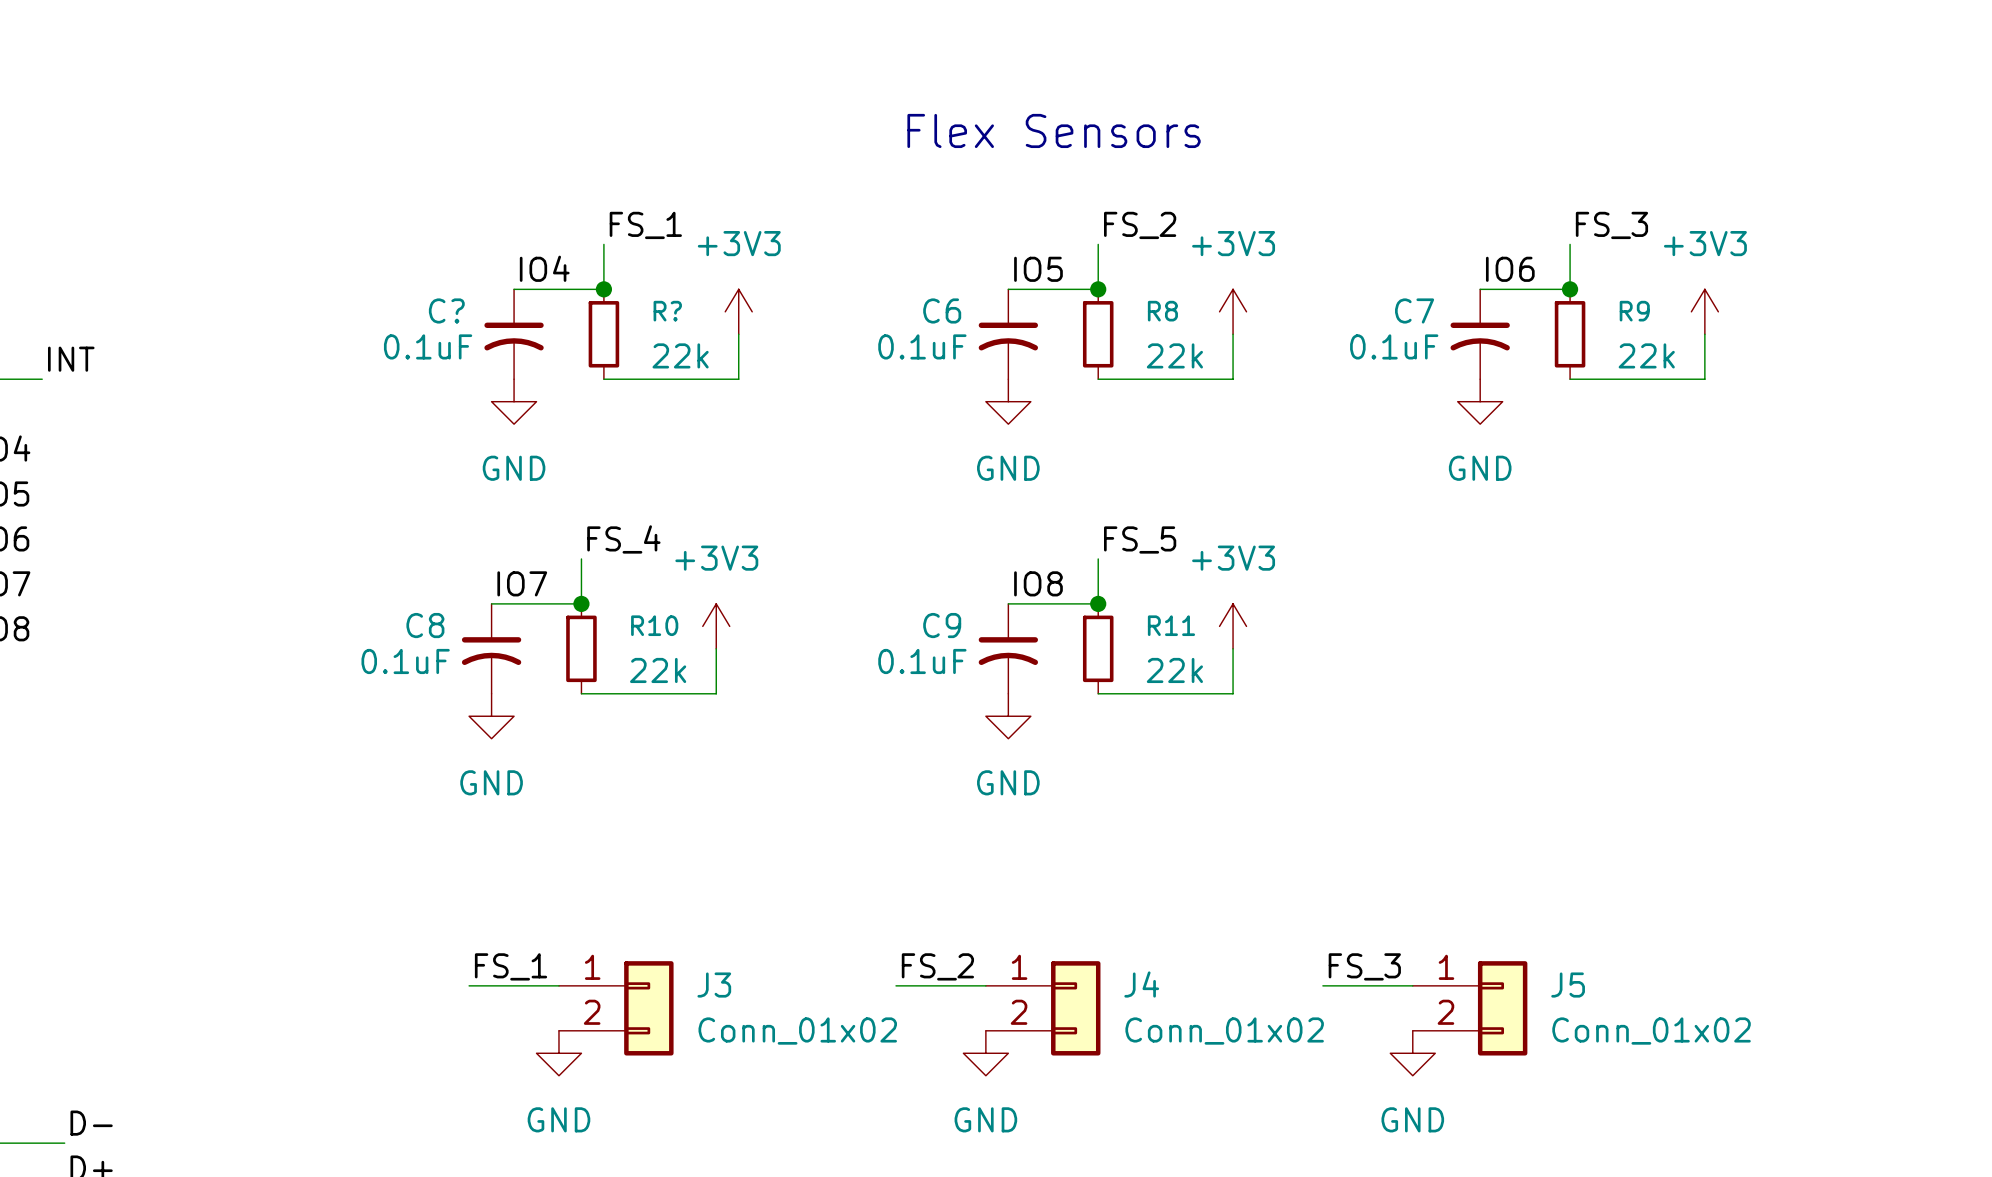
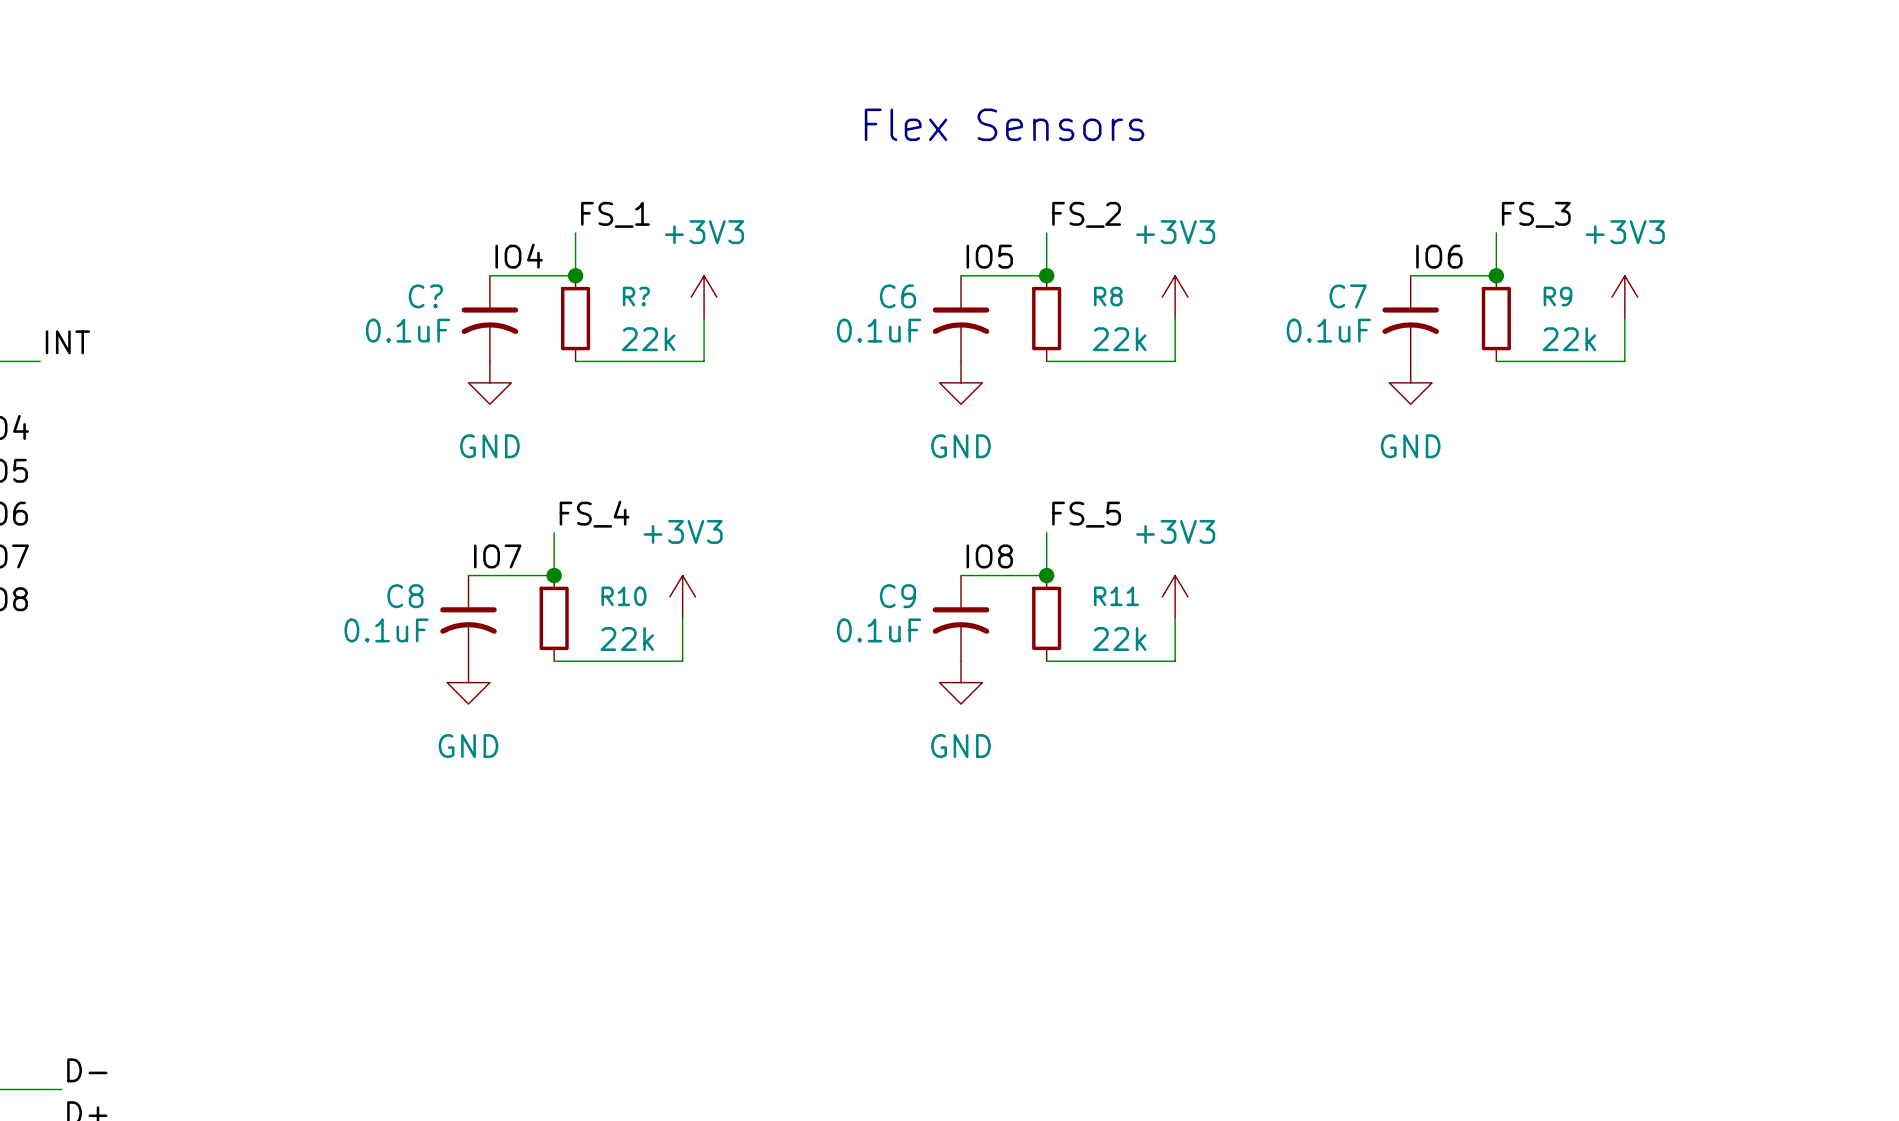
label: FS_1 (511, 966) -> none
label: FS_2 (937, 966) -> none
label: FS_3 (1364, 966) -> none
wire: (469, 985) (558, 985) -> none
wire: (896, 985) (985, 985) -> none
wire: (1322, 985) (1412, 985) -> none
J3: Conn_01x02 (616, 1008) -> none
J4: Conn_01x02 (1043, 1008) -> none
J5: Conn_01x02 (1470, 1008) -> none
power symbol: GND (558, 1053) -> none
power symbol: GND (985, 1053) -> none
power symbol: GND (1412, 1053) -> none

